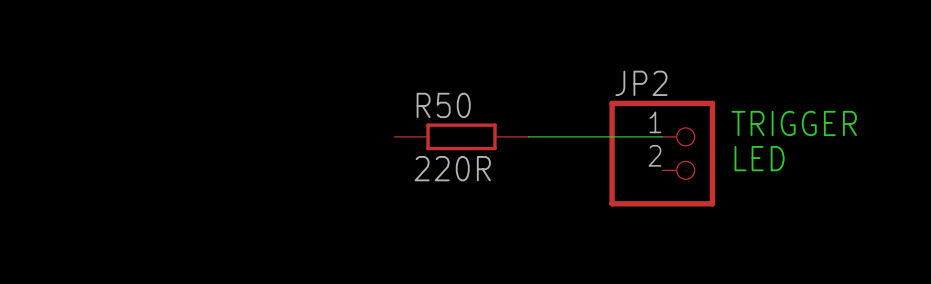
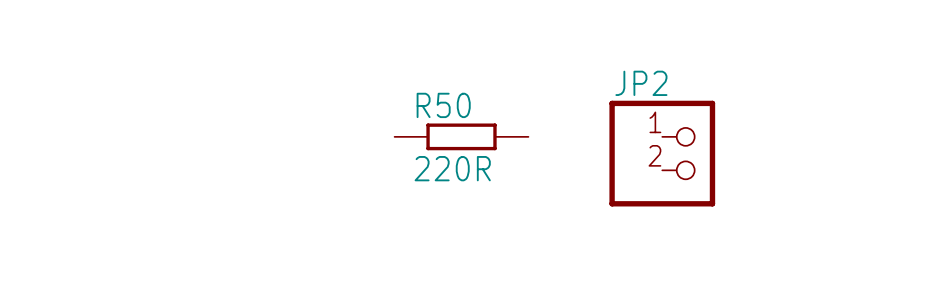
text: TRIGGER (794, 123) -> none
wire: (528, 136) (662, 136) -> none
text: LED (759, 158) -> none

